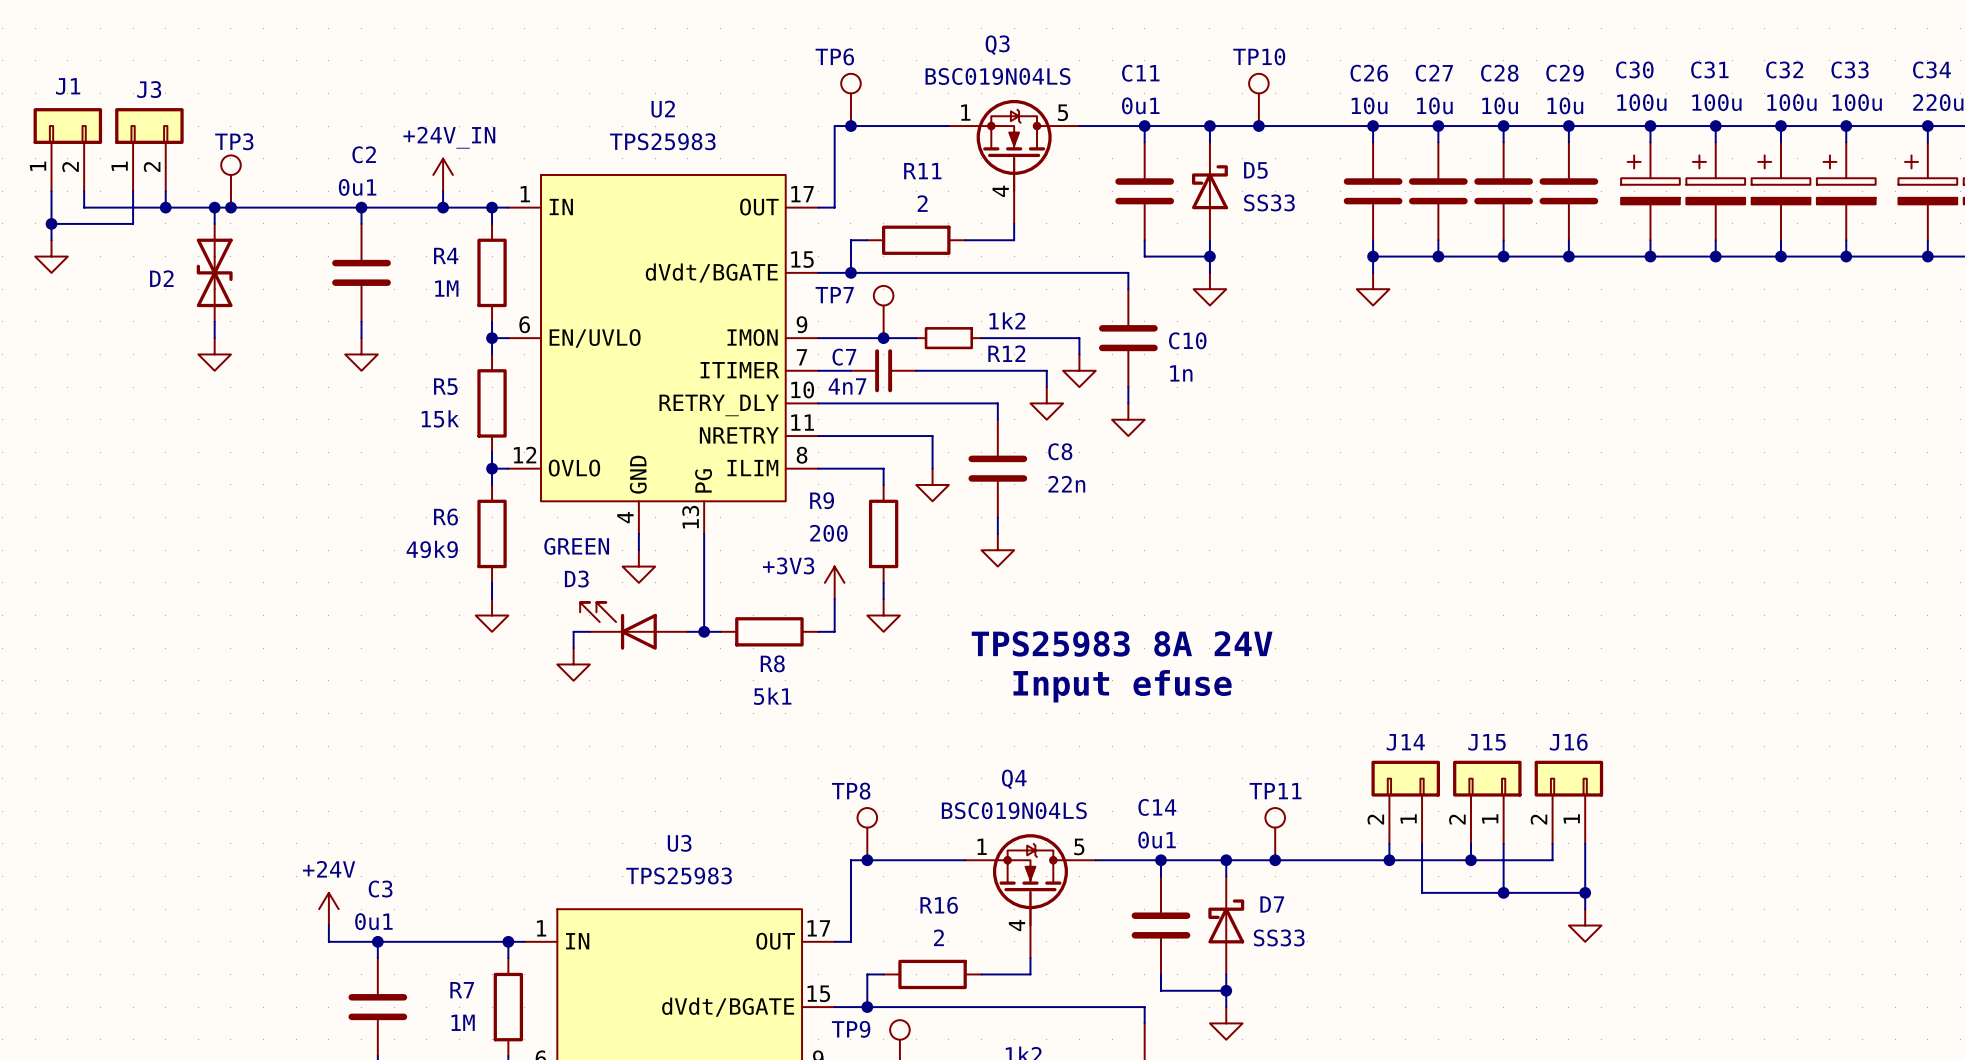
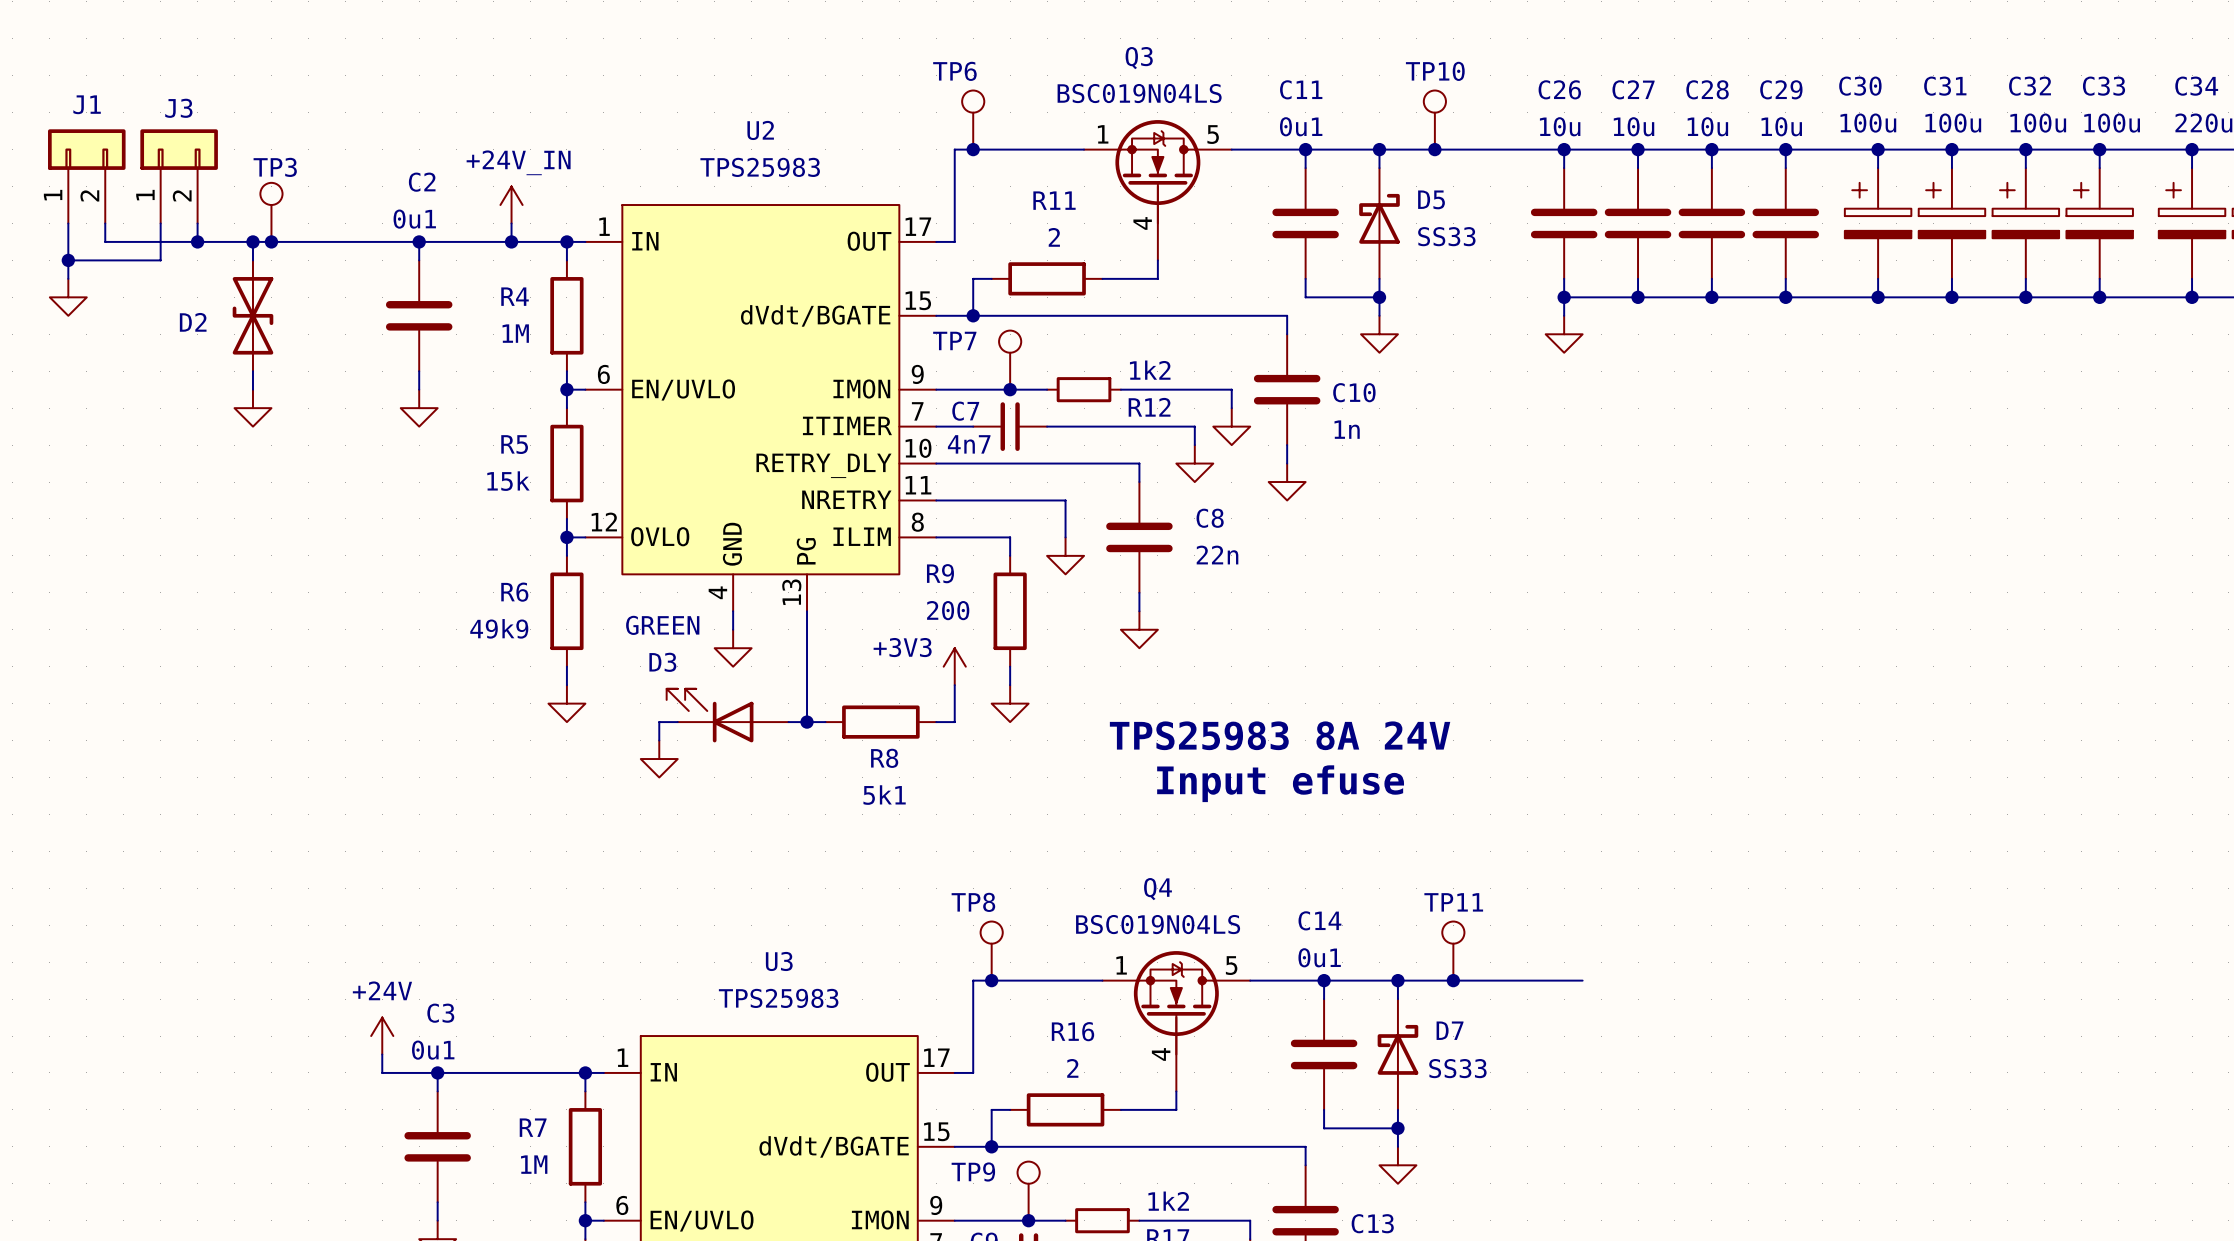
J14: (1405, 802) -> none
J15: (1487, 802) -> none
J16: (1568, 802) -> none
wire: (1389, 843) (1389, 860) (1552, 860) (1552, 843) -> none
wire: (1422, 843) (1422, 892) (1585, 892) -> none
wire: (1470, 843) (1470, 860) -> none
wire: (1503, 843) (1503, 892) -> none
wire: (1585, 843) (1585, 909) -> none
junction: (1389, 860) -> none
junction: (1470, 860) -> none
junction: (1503, 892) -> none
junction: (1585, 892) -> none
power symbol: (1585, 925) -> none

